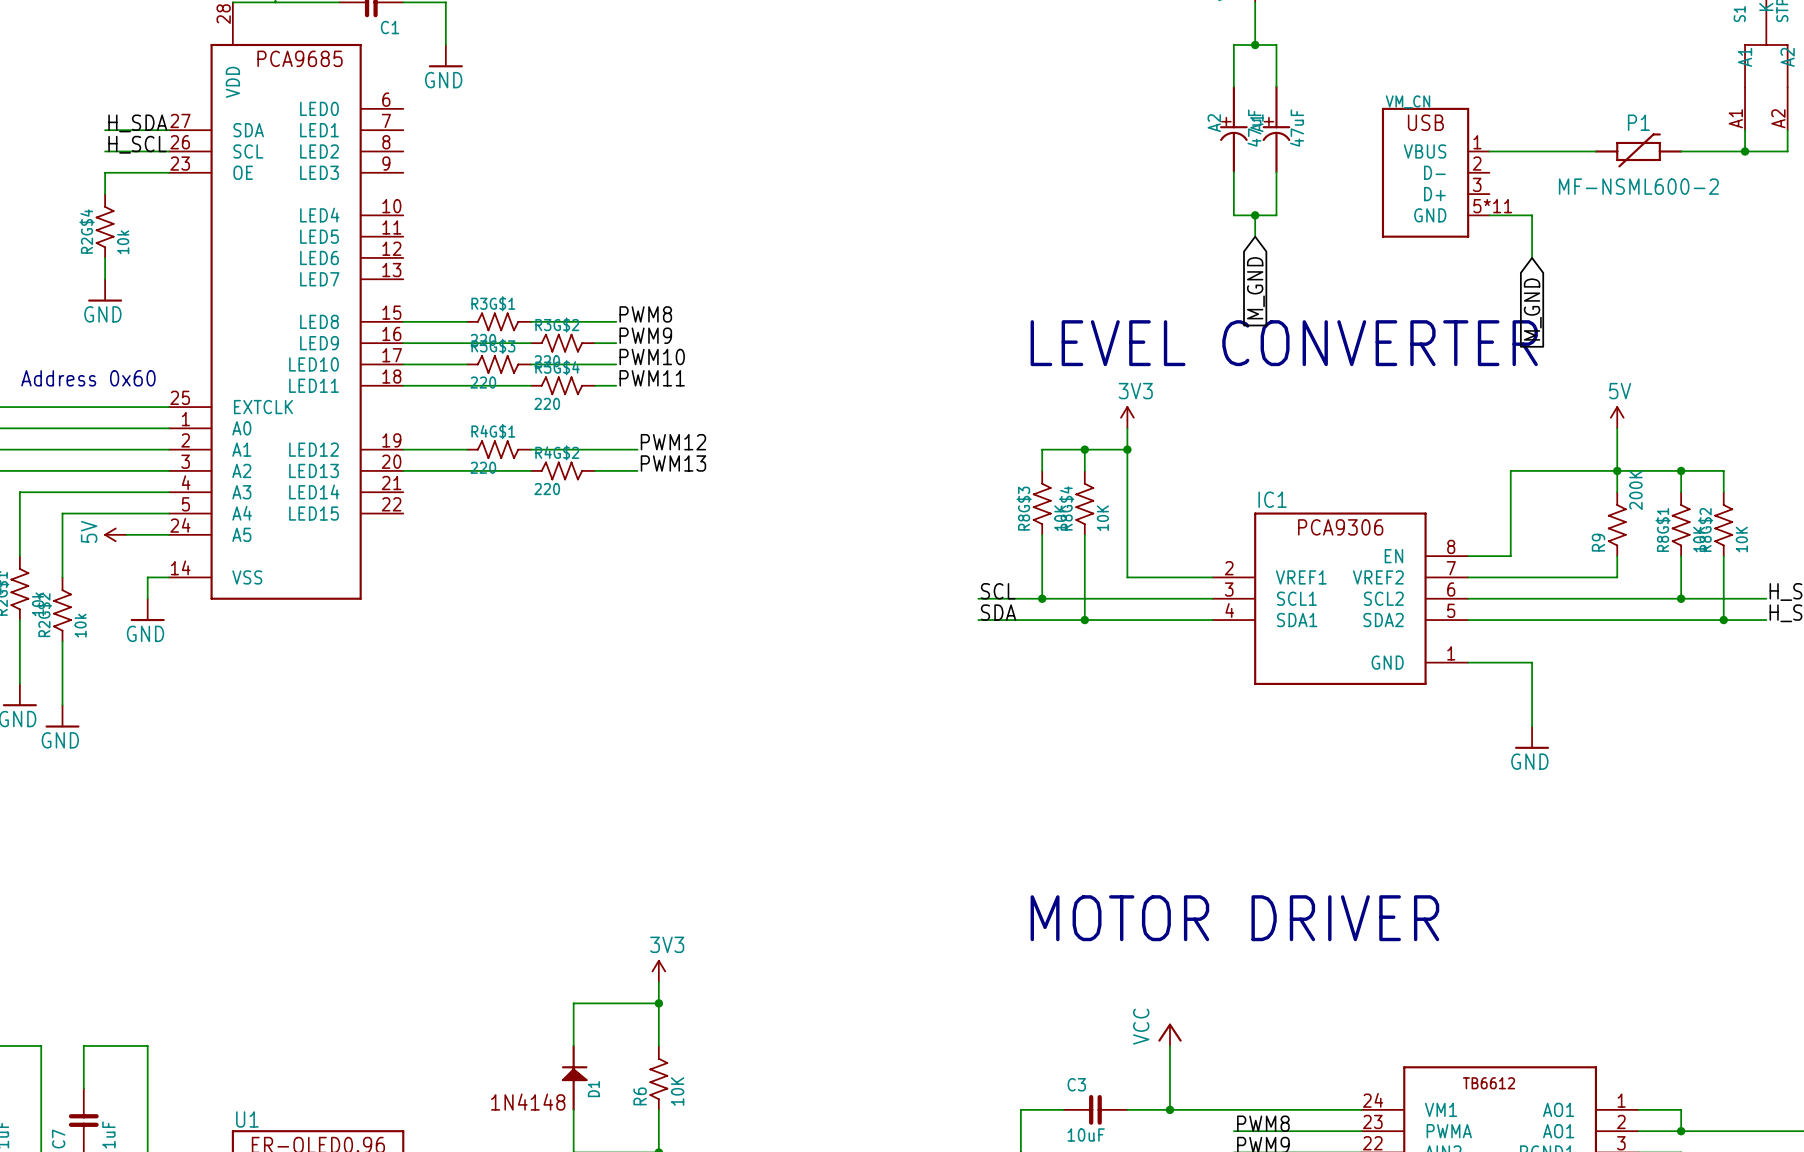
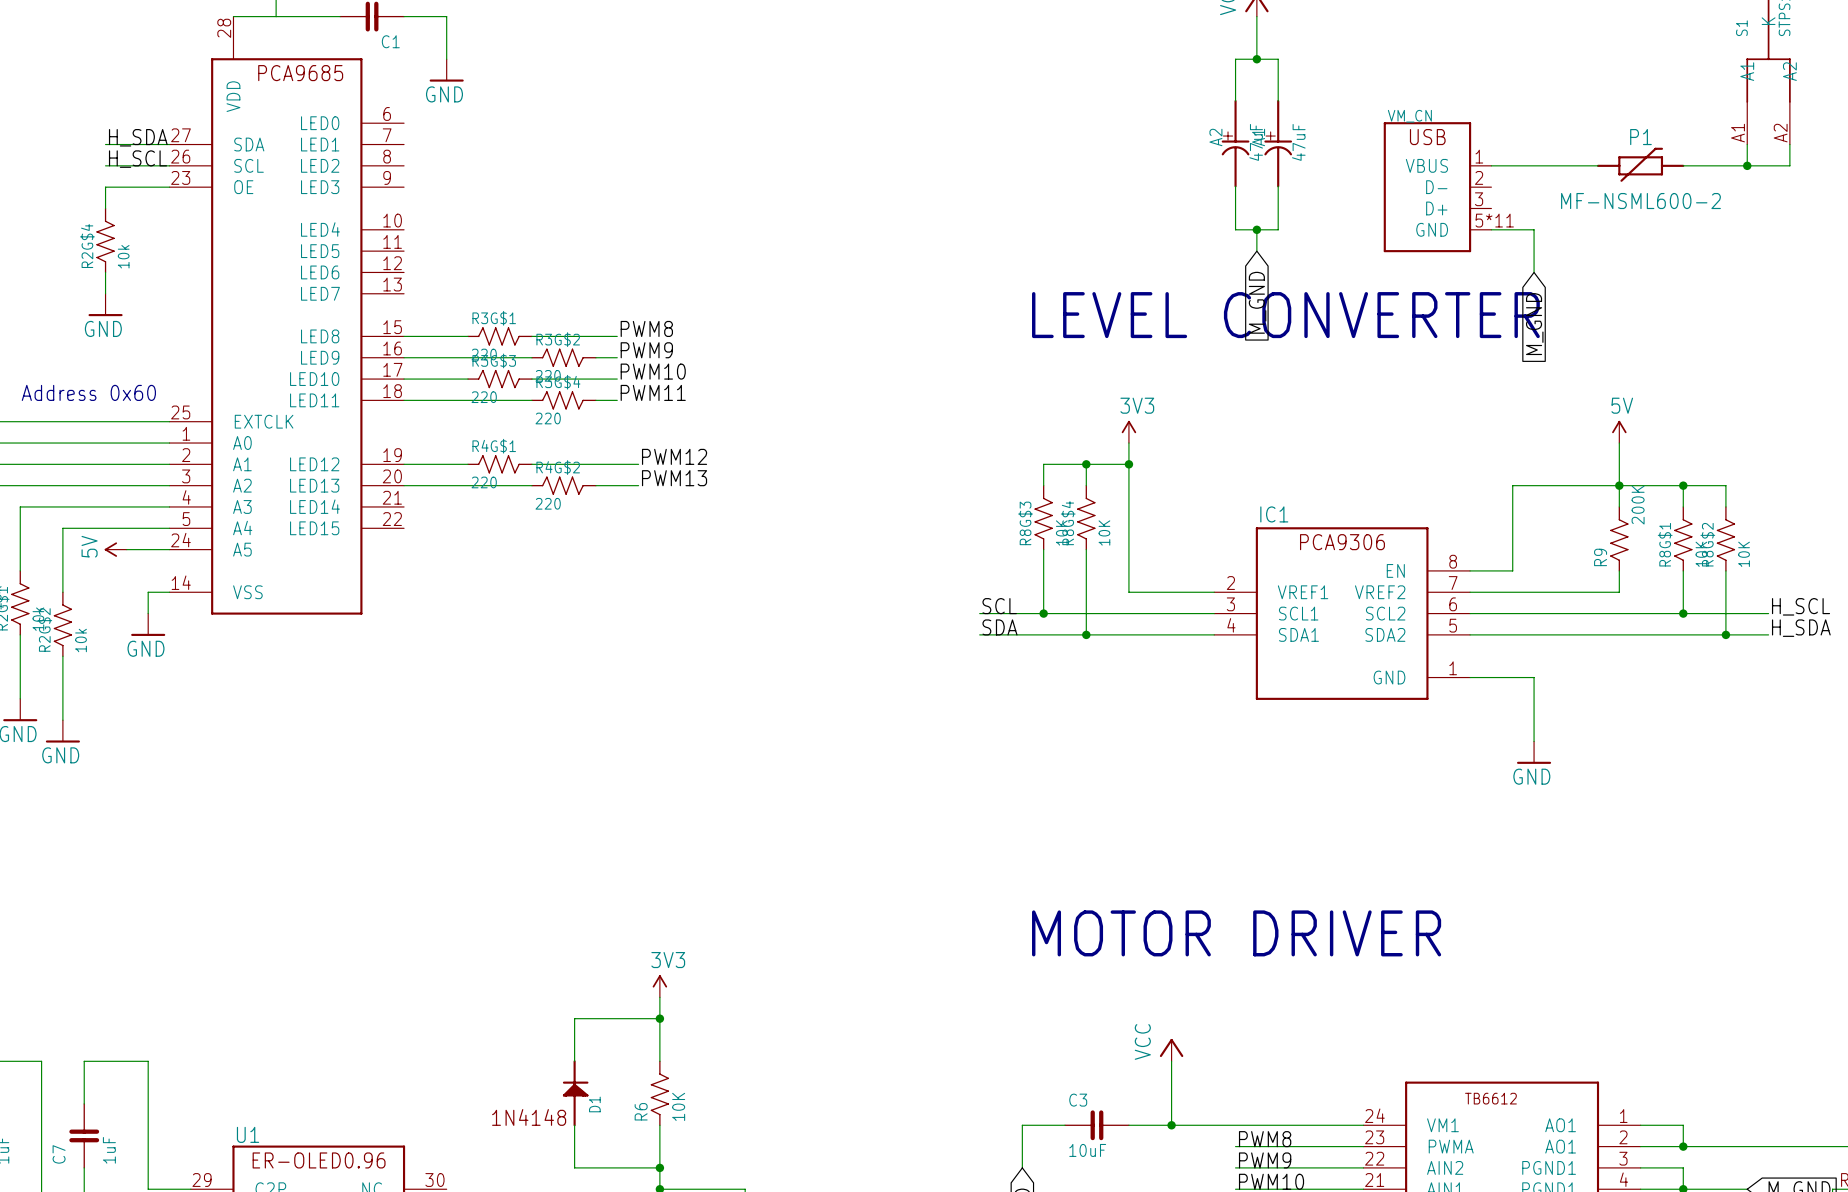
text position: LEVEL CONVERTER (1284, 343) -> LEVEL CONVERTER (1285, 315)

